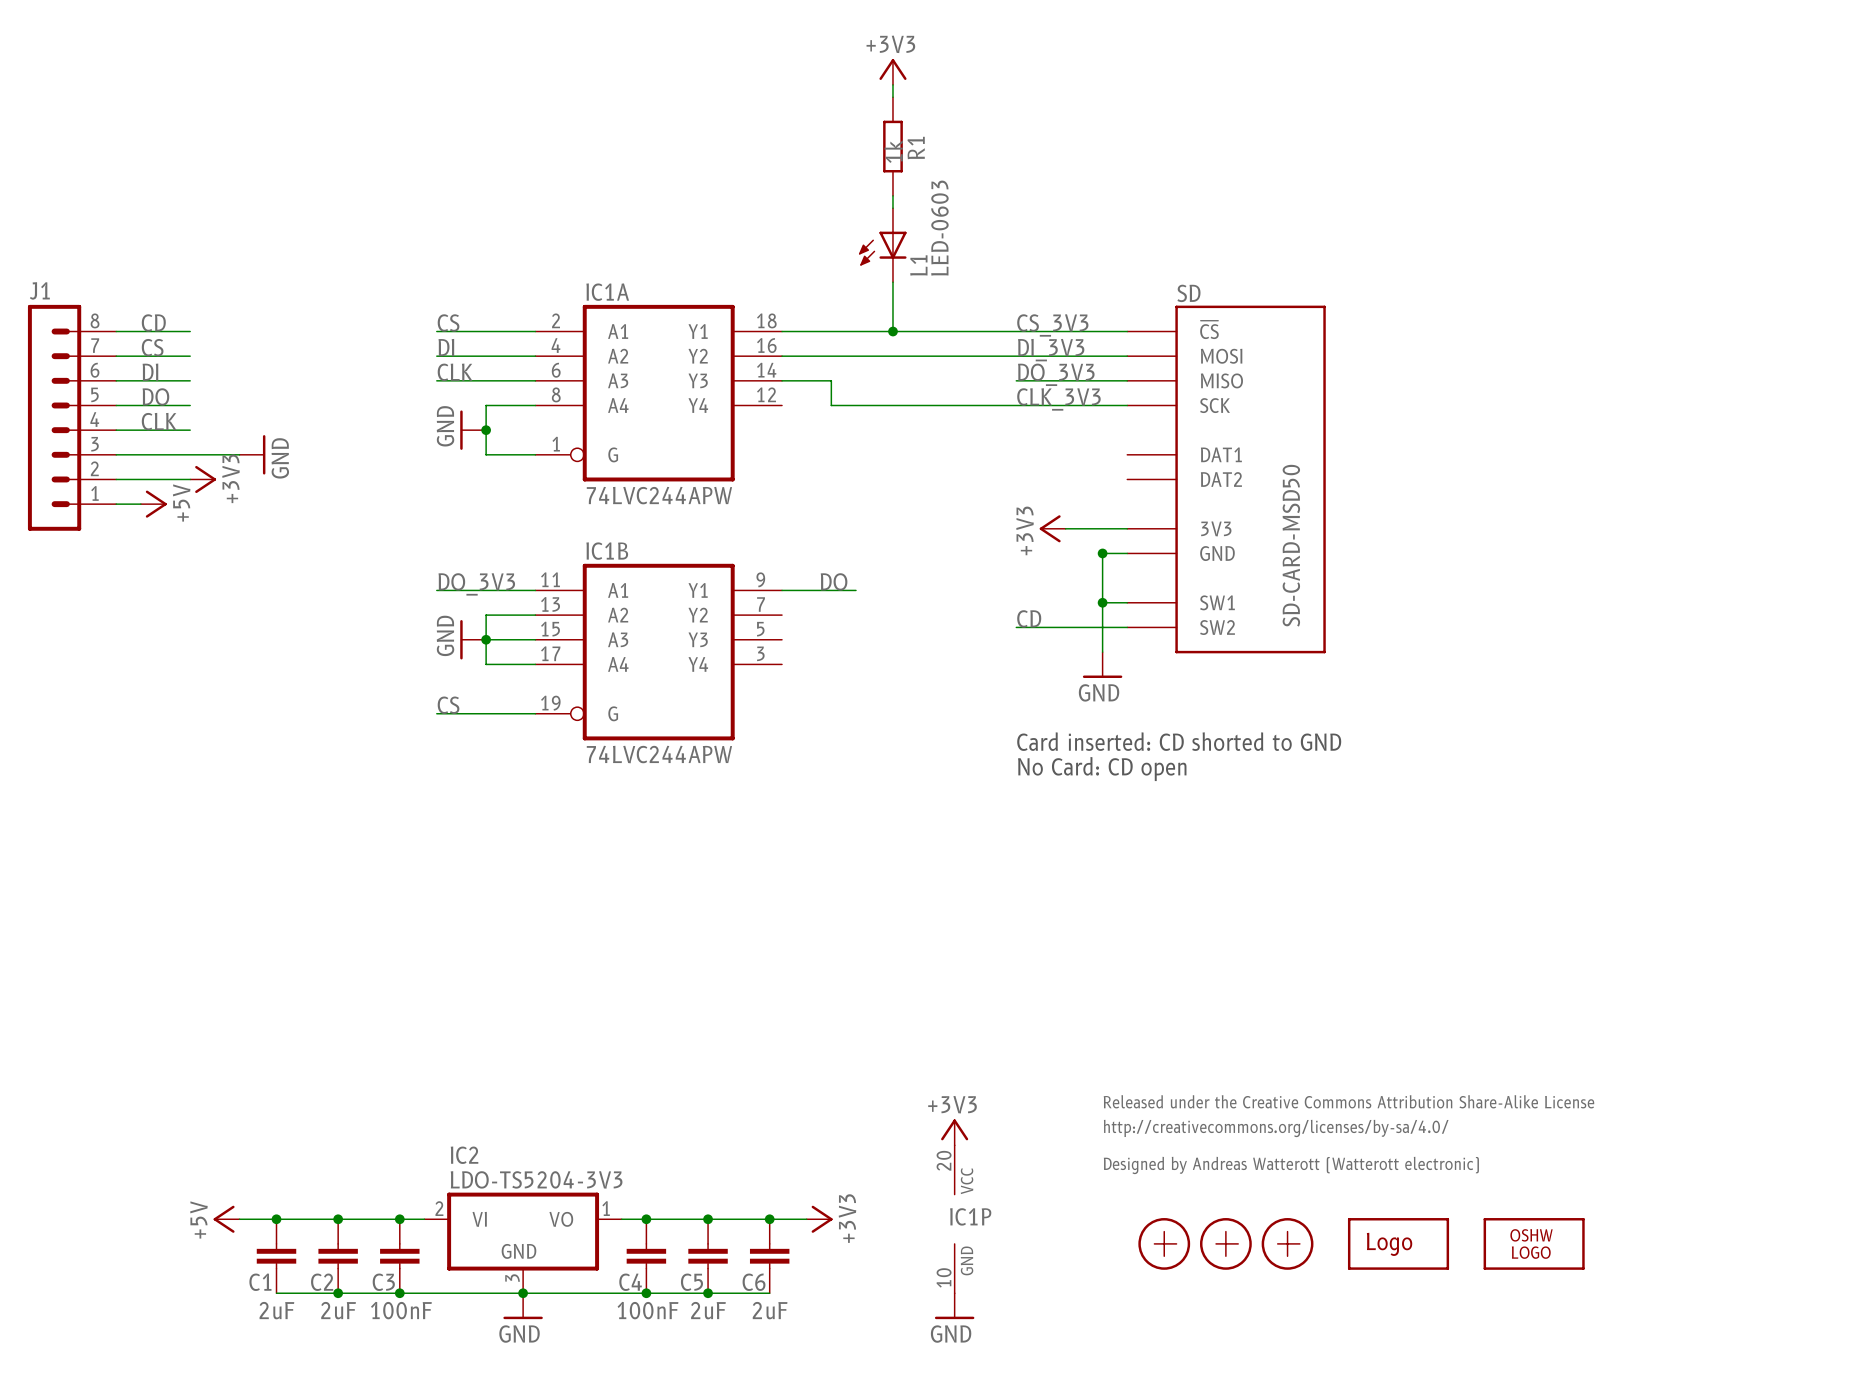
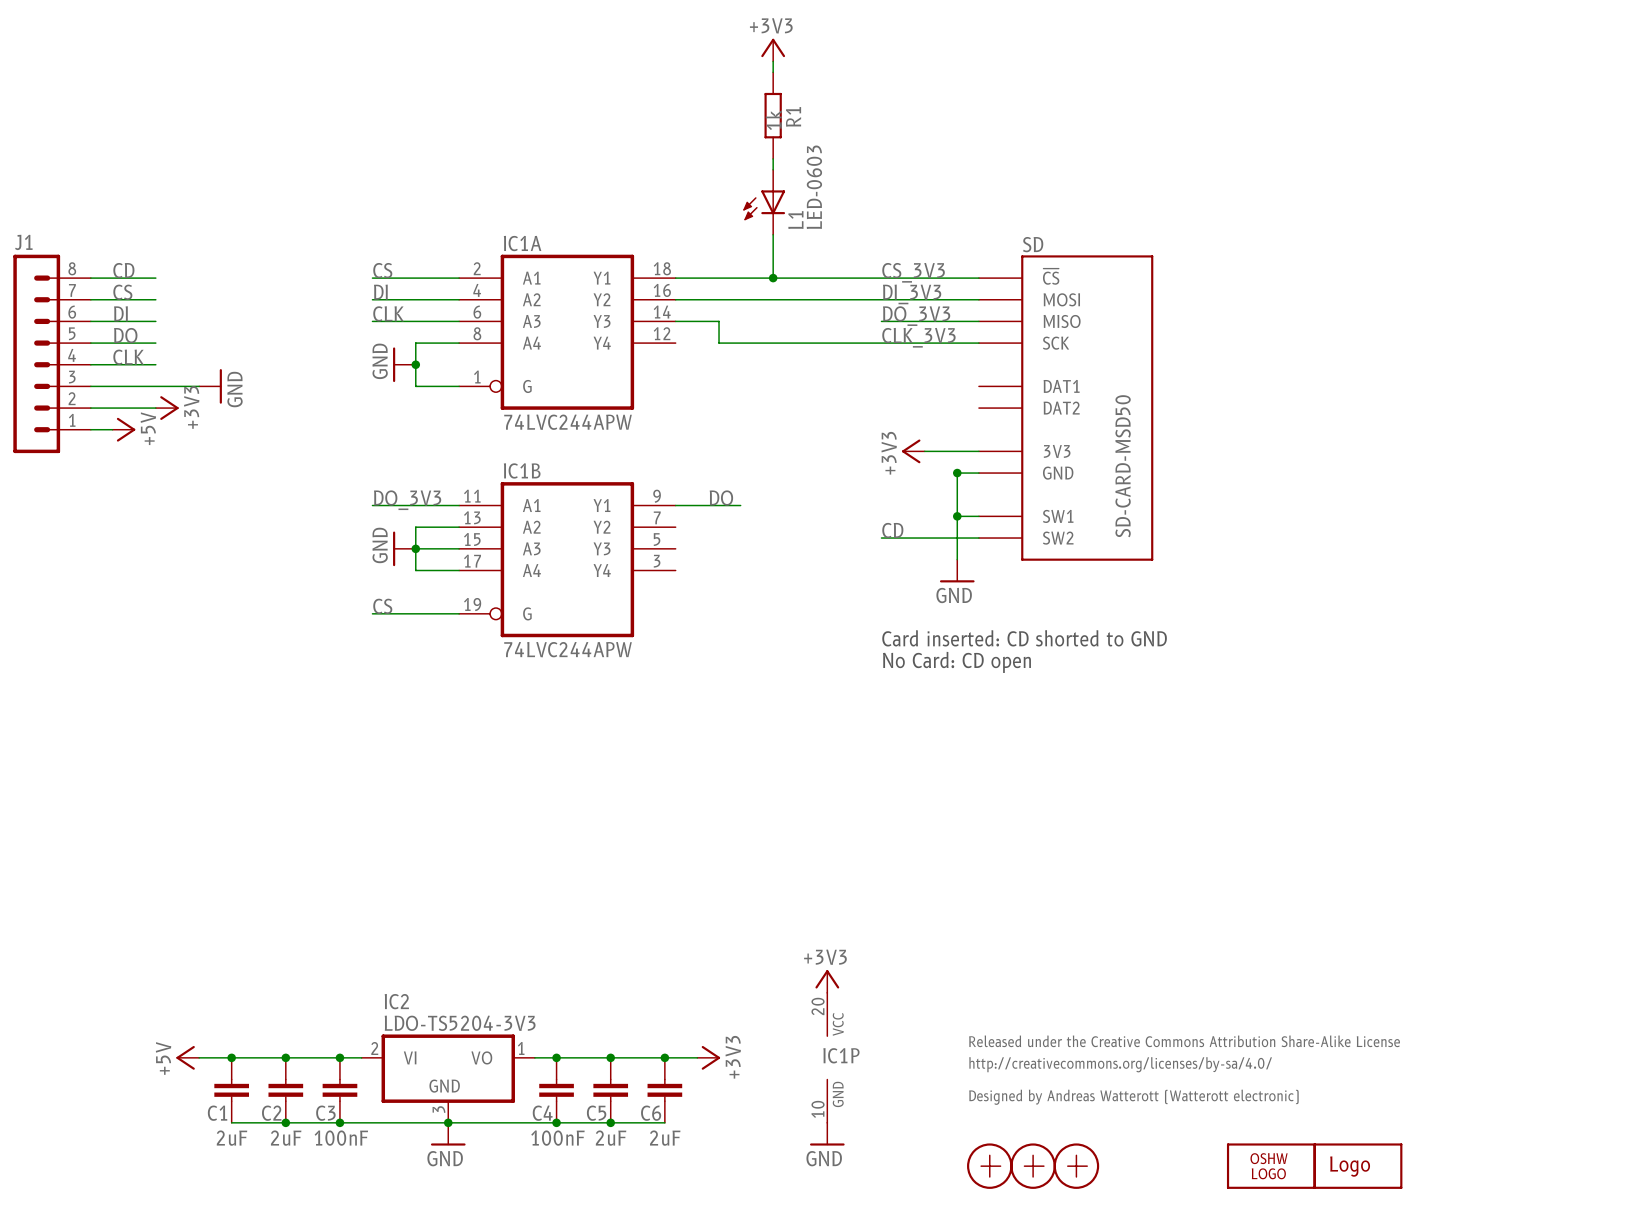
text position: Released under the Creative Commons Attribution Share-Alike License (1348, 1101) -> Released under the Creative Commons Attribution Share-Alike License (1184, 1041)
text position: http://creativecommons.org/licenses/by-sa/4.0/ (1276, 1128) -> http://creativecommons.org/licenses/by-sa/4.0/ (1120, 1064)
text position: Designed by Andreas Watterott (Watterott electronic) (1291, 1165) -> Designed by Andreas Watterott (Watterott electronic) (1133, 1097)
part: (1164, 1243) -> none
part: (1225, 1243) -> none
part: (1287, 1243) -> none
part position: (1398, 1243) -> (1357, 1166)
part position: (1534, 1243) -> (1271, 1166)
part: none -> (989, 1166)
part: none -> (1033, 1166)
part: none -> (1076, 1166)

